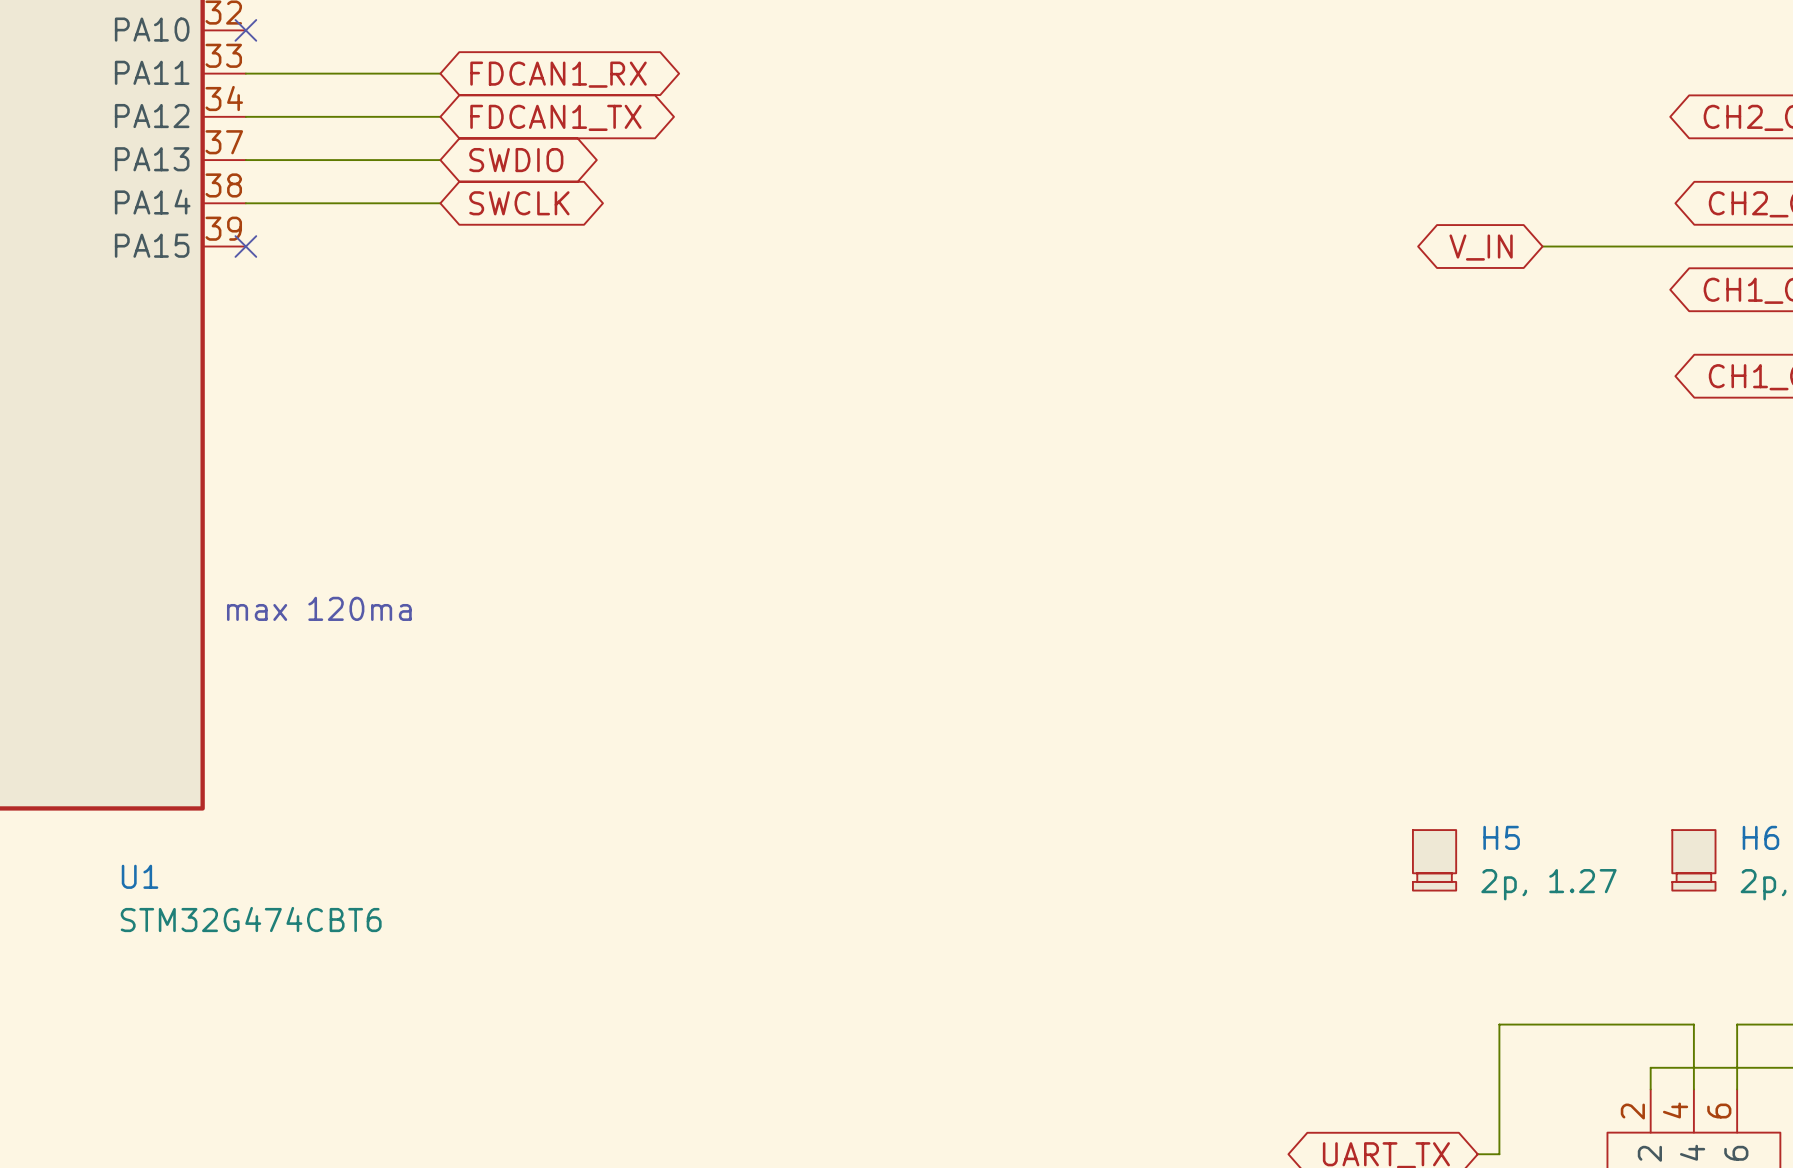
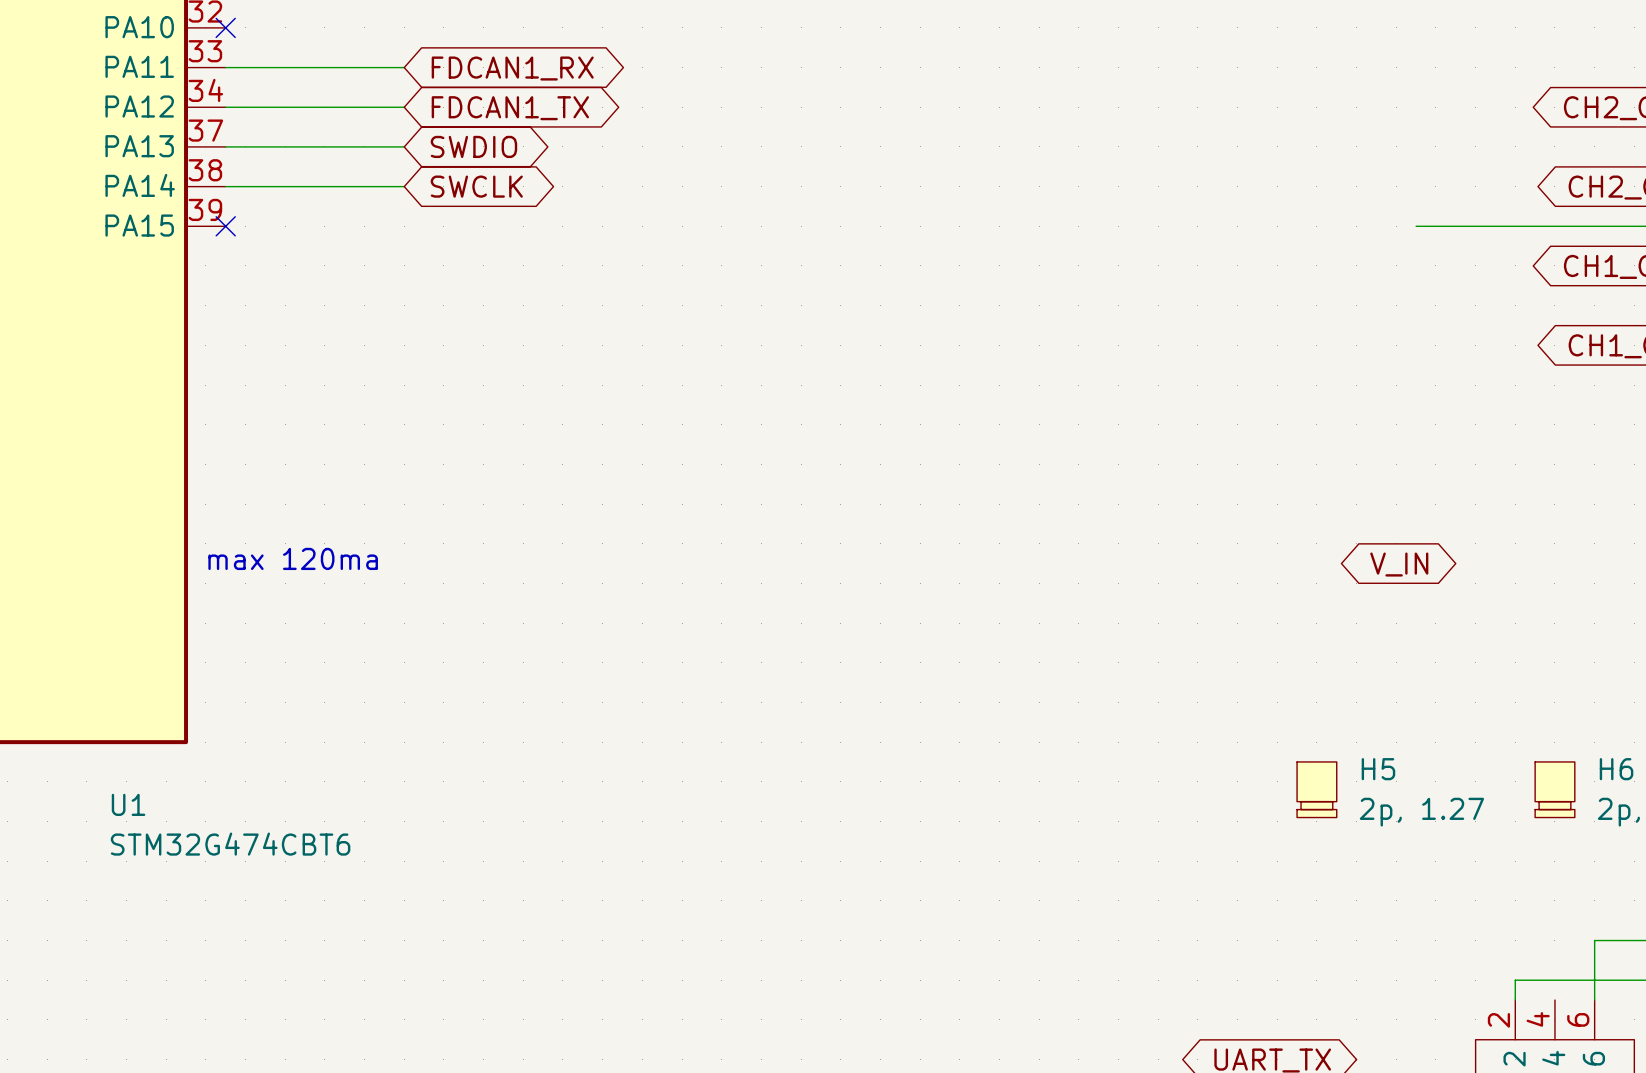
global label position: V_IN (1481, 247) -> V_IN (1399, 564)
wire: (1693, 1089) (1693, 1024) (1499, 1024) (1499, 1154) (1477, 1154) -> none

